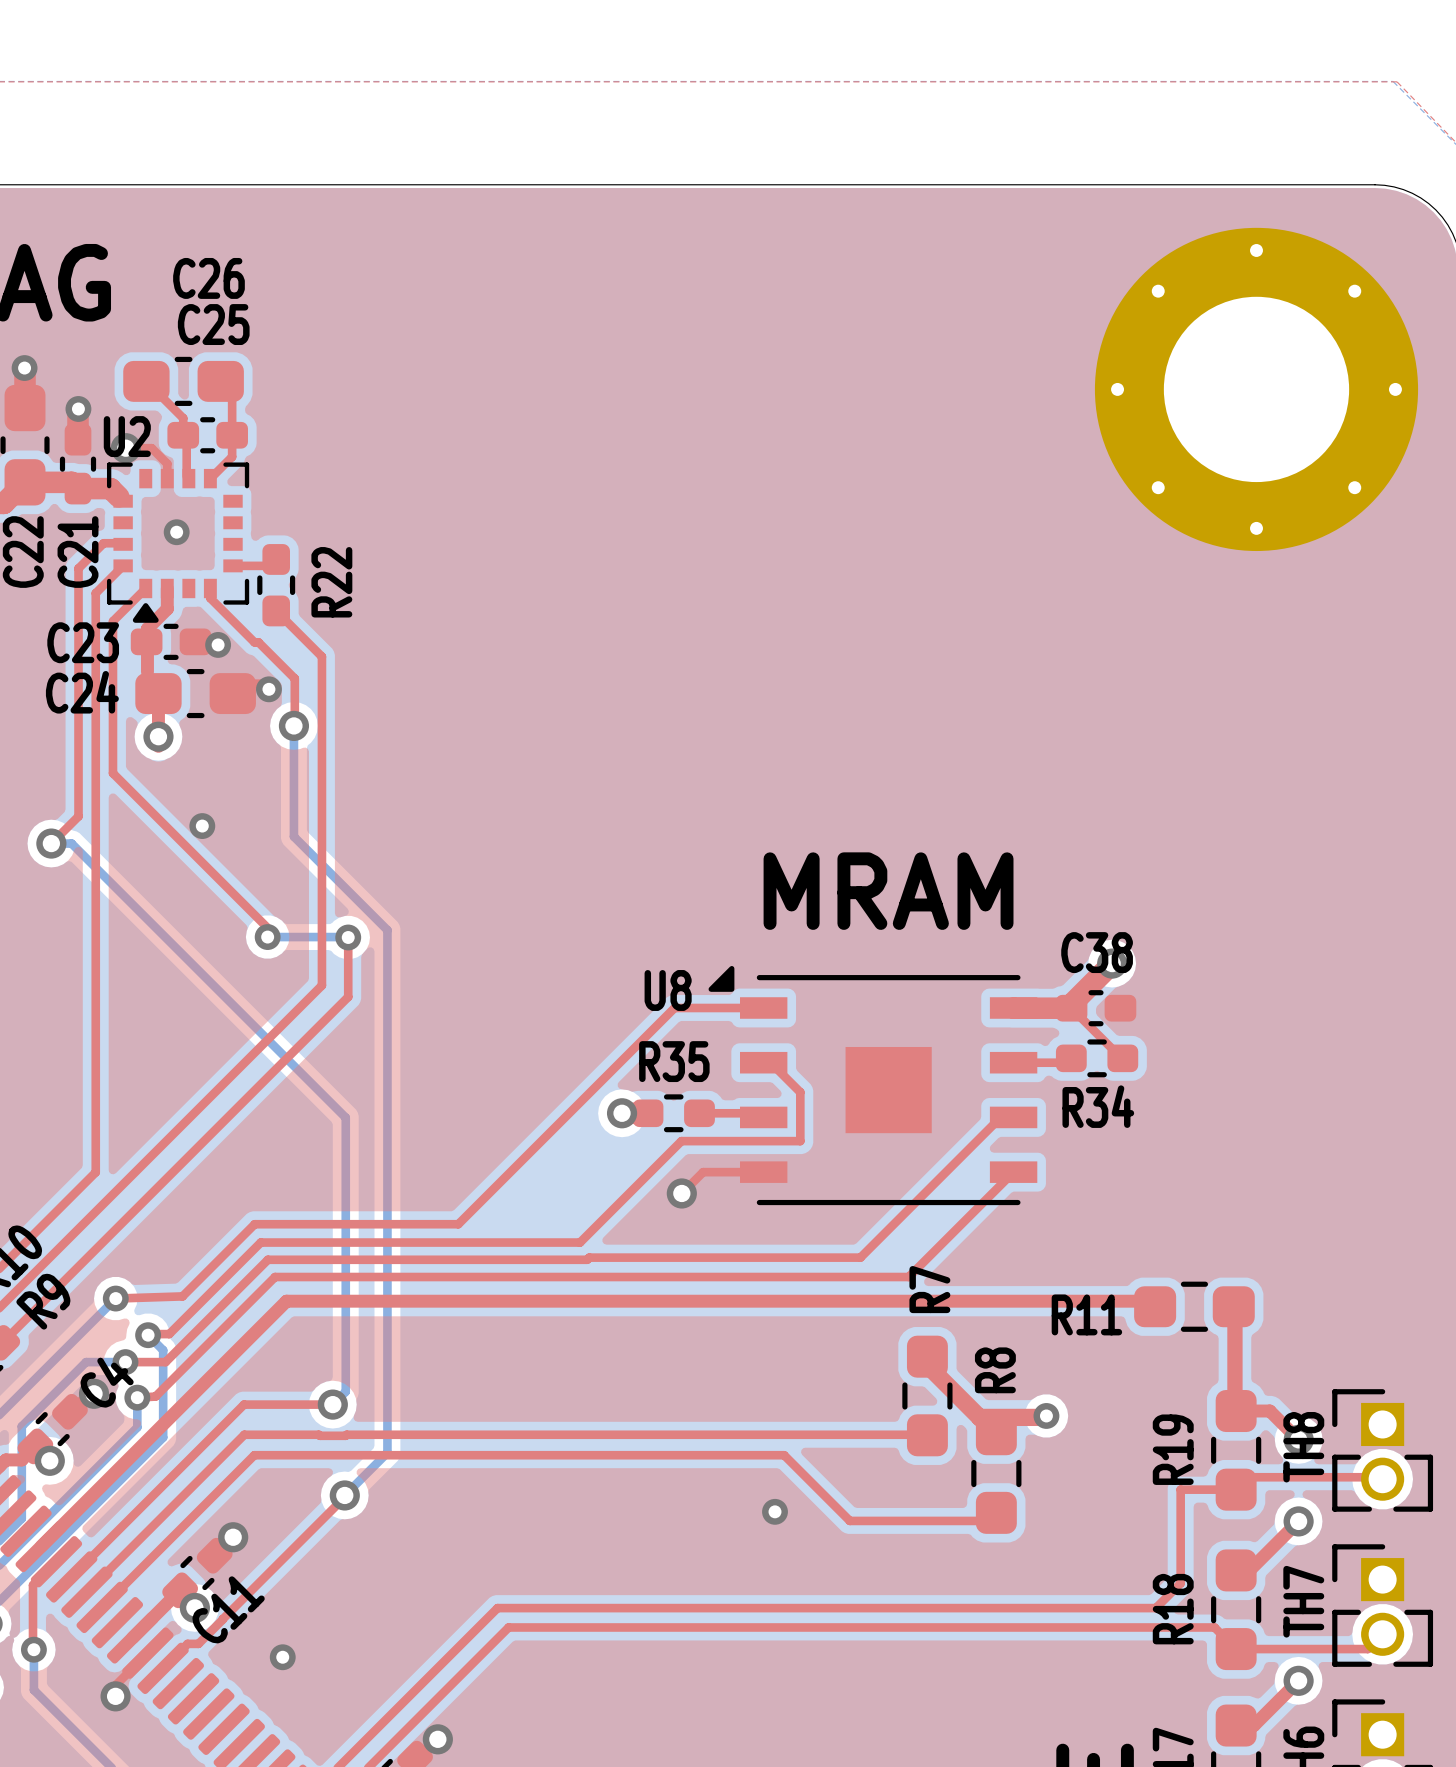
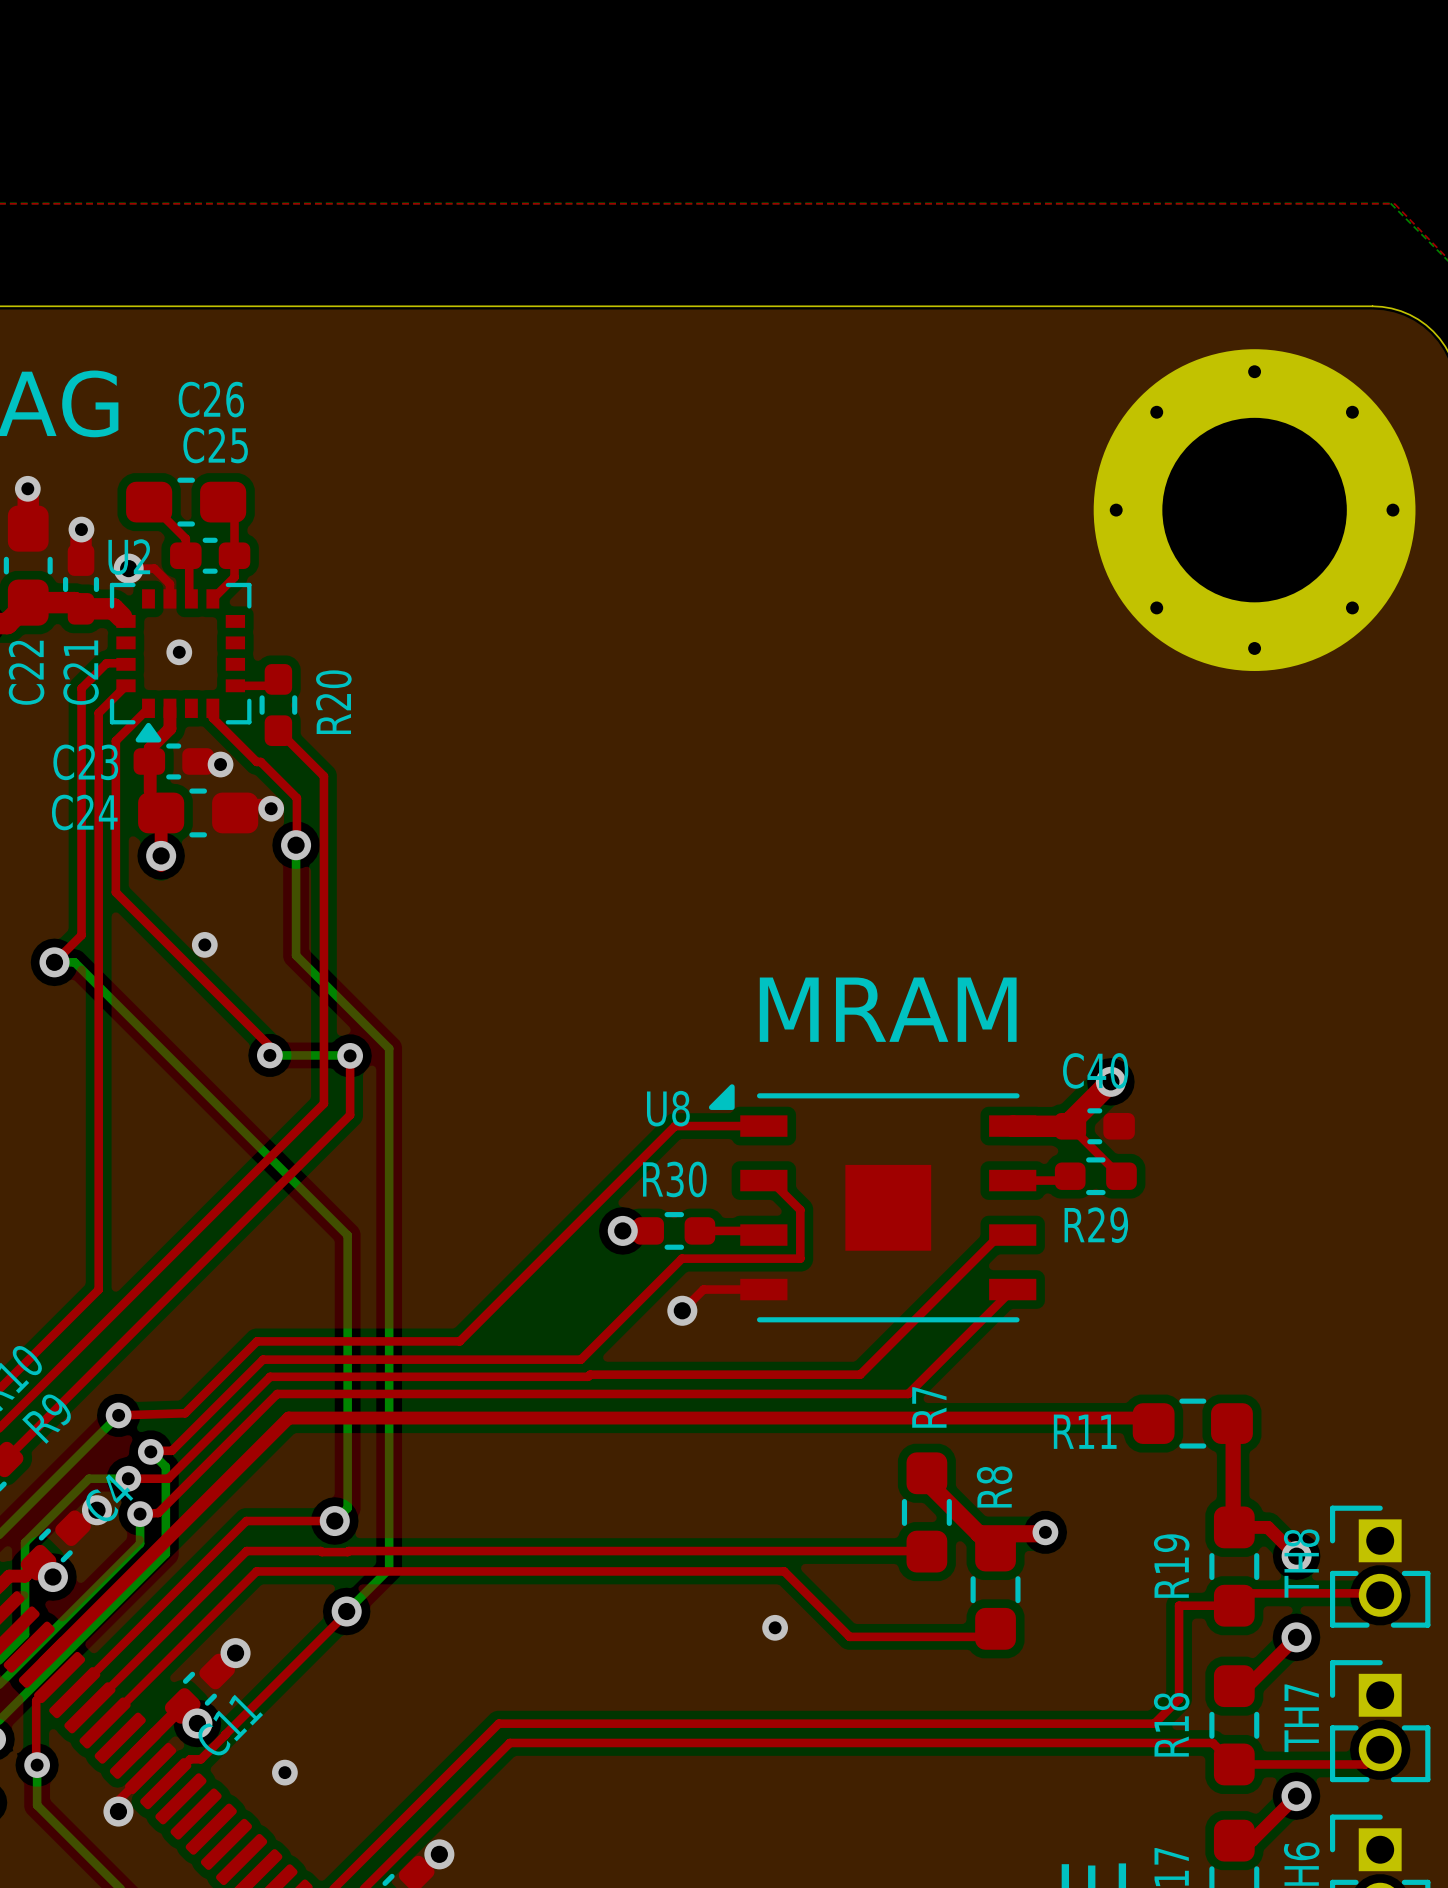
R22 name: R22 (331, 582) -> R20 (333, 702)
C38 name: C38 (1097, 952) -> C40 (1095, 1070)
R35 name: R35 (674, 1061) -> R30 (674, 1179)
R34 name: R34 (1098, 1106) -> R29 (1096, 1225)

